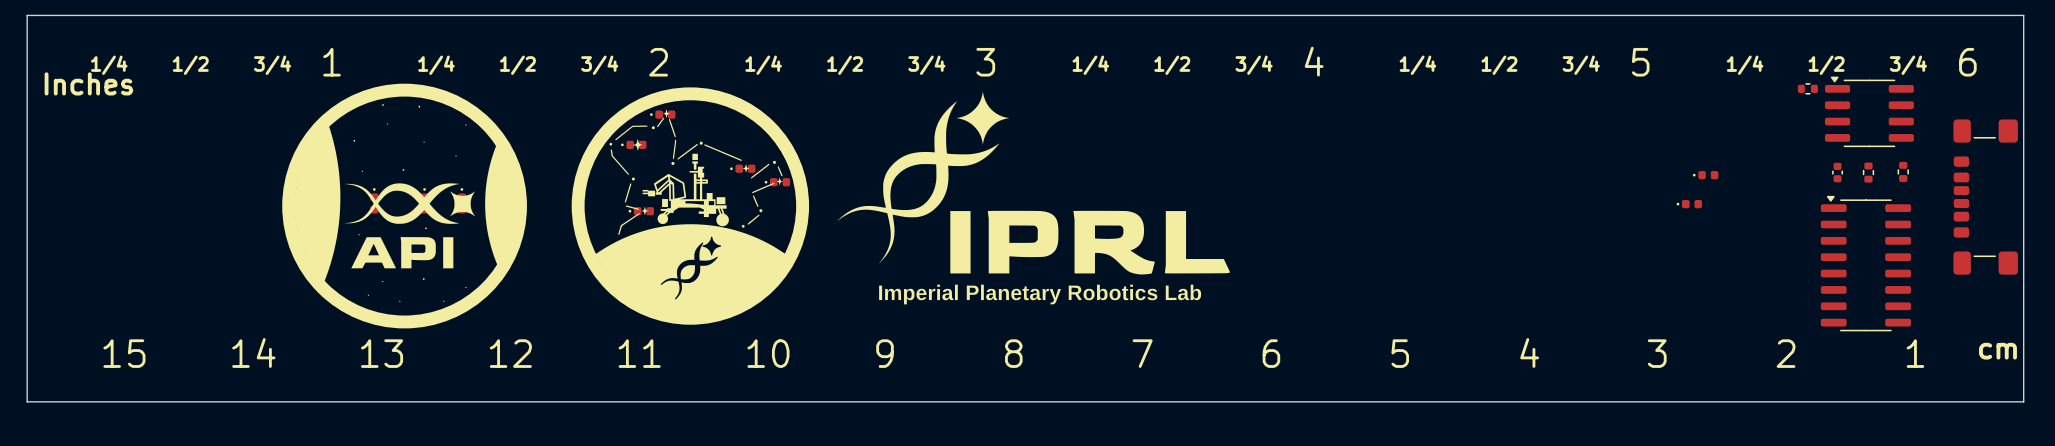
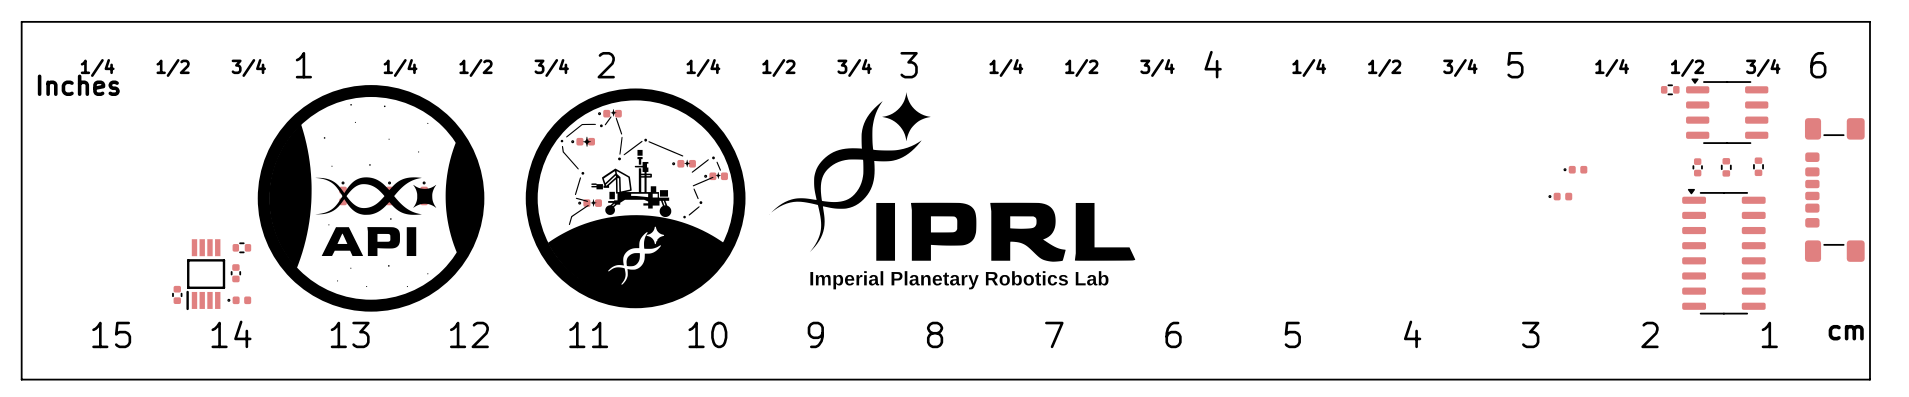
part: none -> (241, 247)
part: none -> (235, 273)
part: none -> (205, 274)
part: none -> (177, 294)
part: none -> (239, 300)

